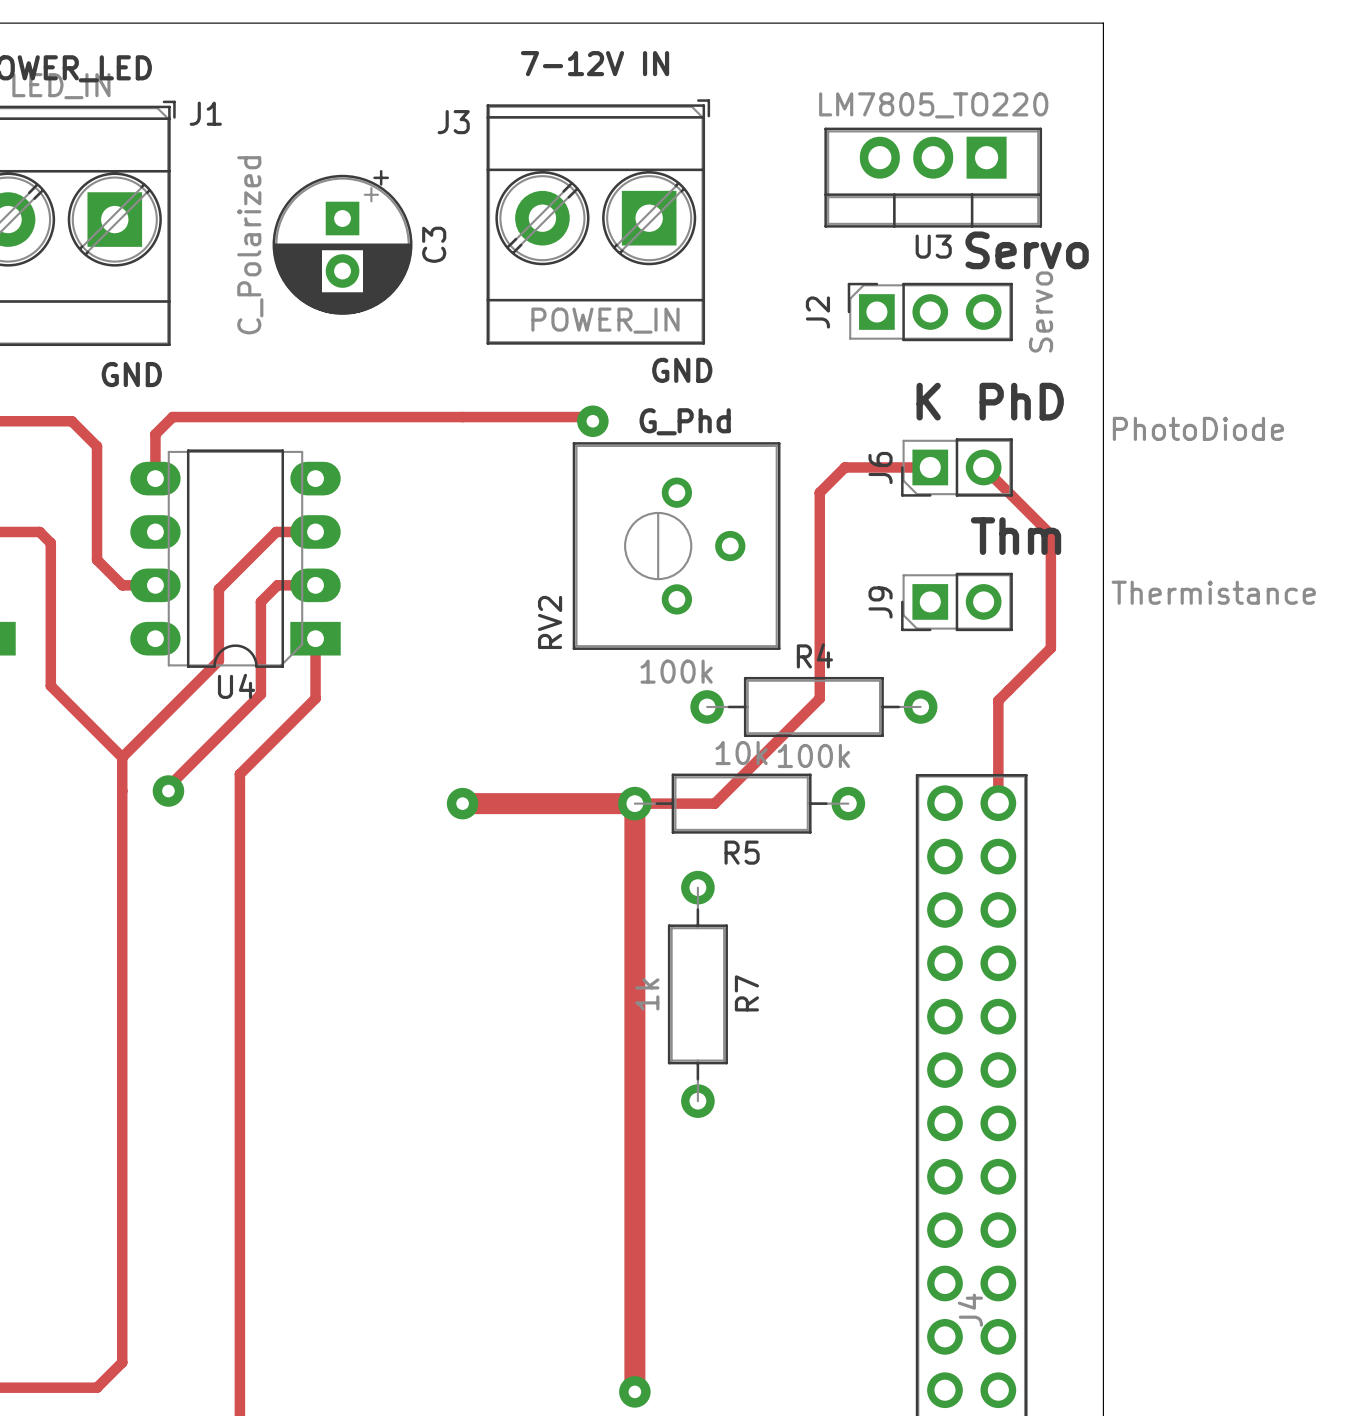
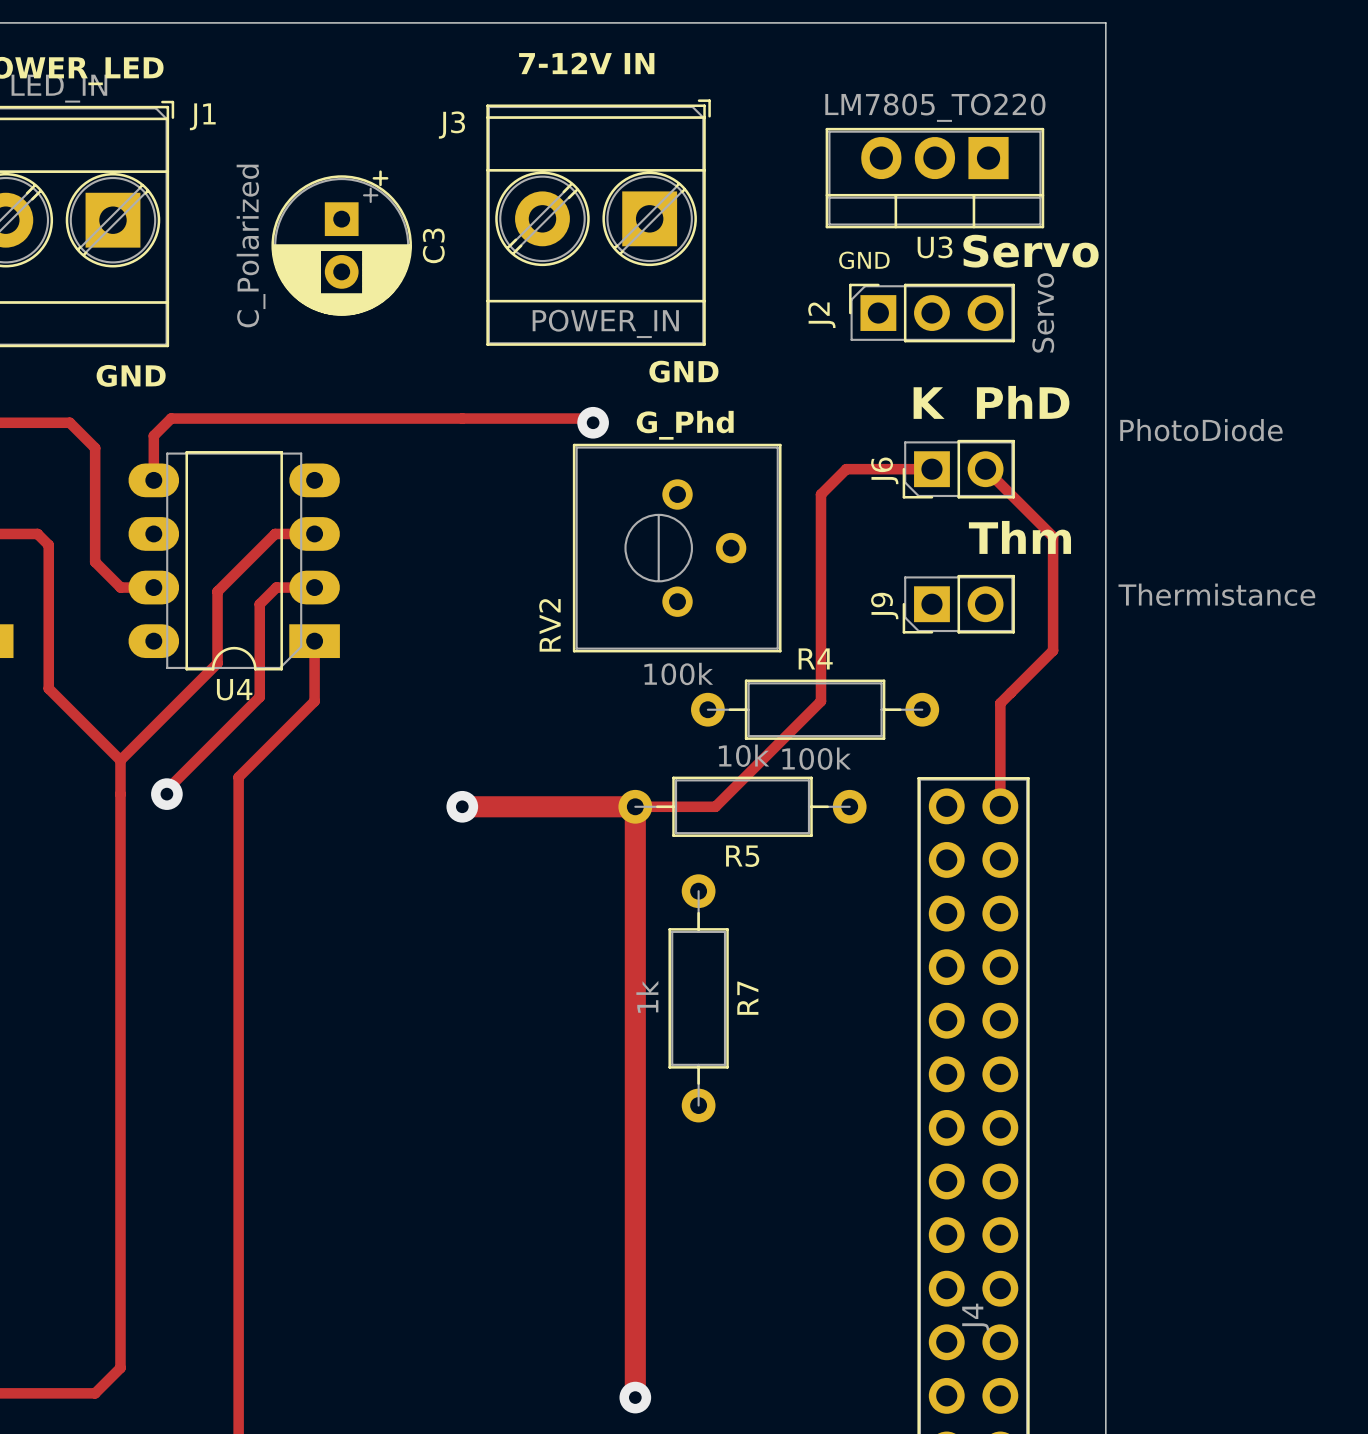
text: none -> GND (864, 260)

